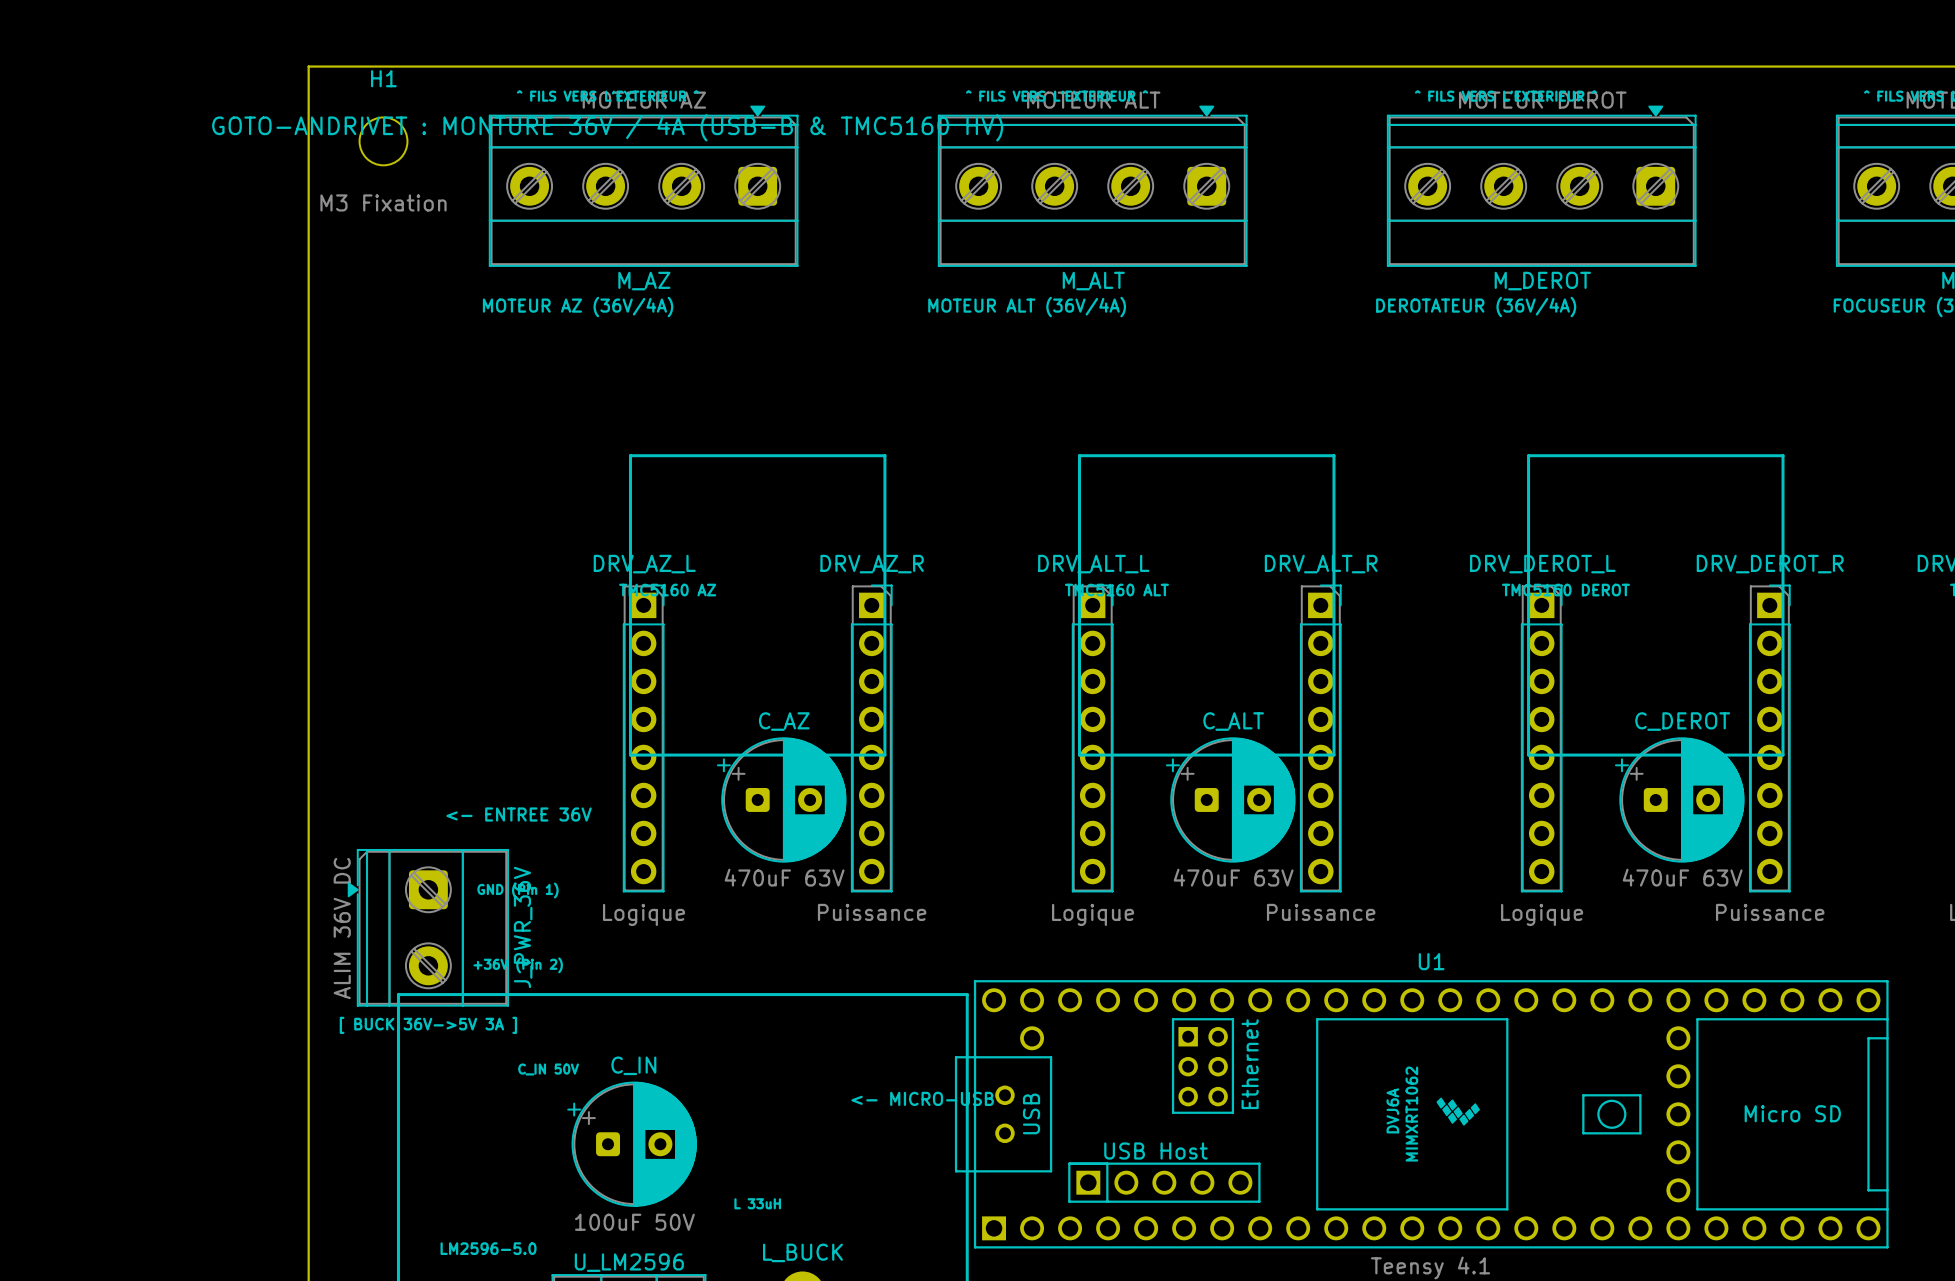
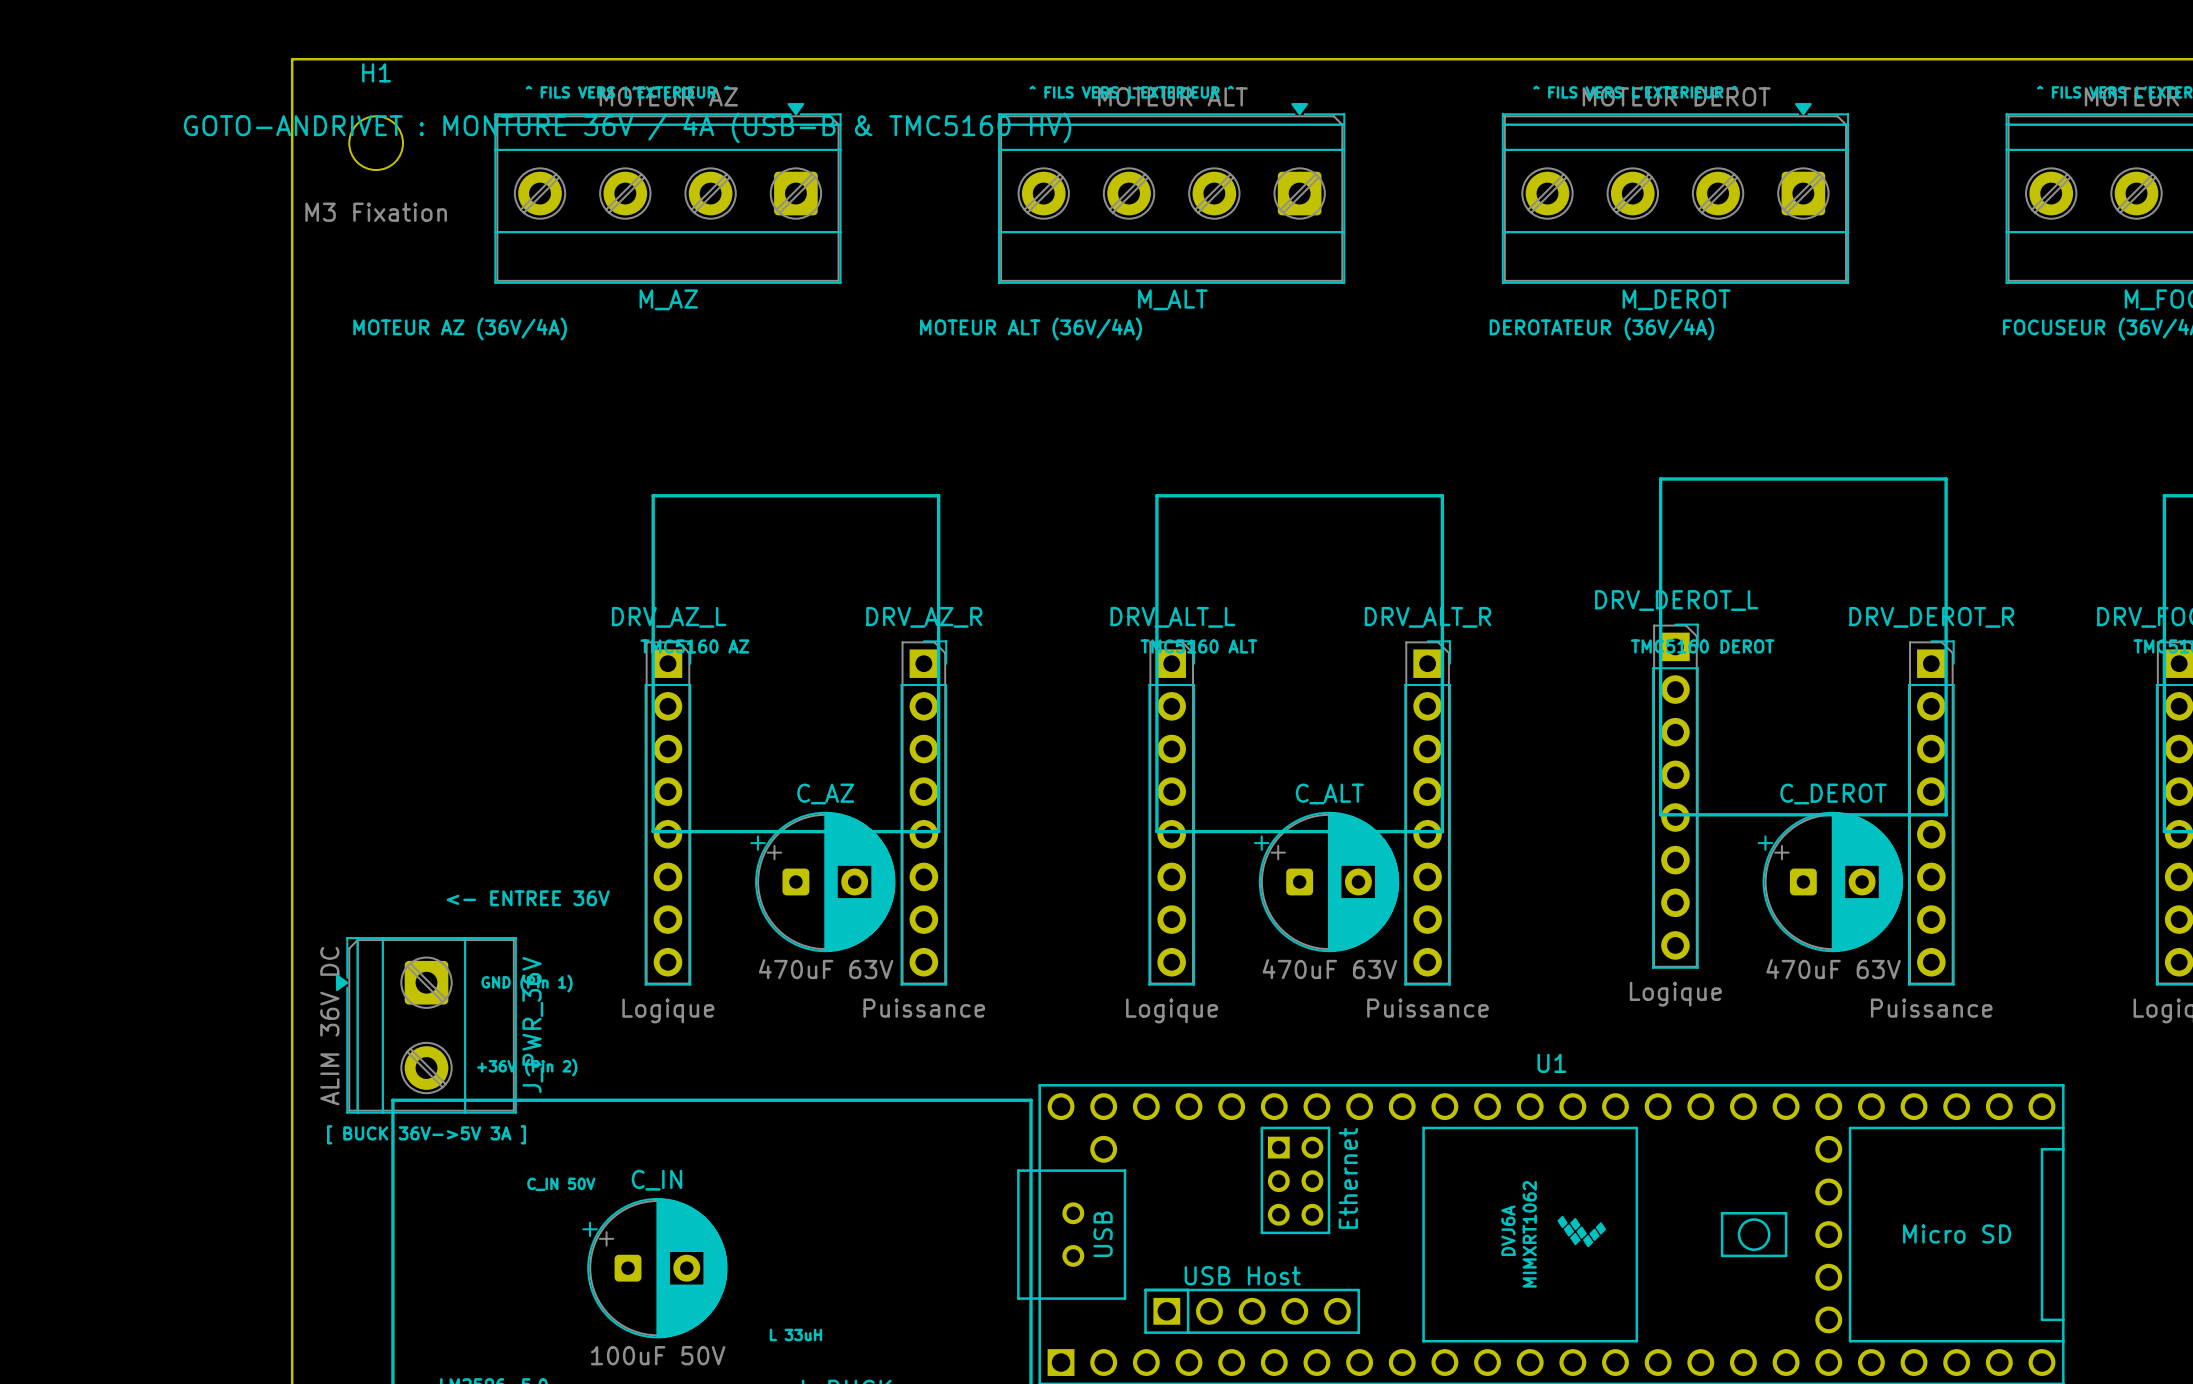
text position: MOTEUR AZ (36V/4A) (578, 307) -> MOTEUR AZ (36V/4A) (460, 328)
text position: MOTEUR ALT (36V/4A) (1027, 307) -> MOTEUR ALT (36V/4A) (1030, 328)
line: (1528, 455) (1783, 455) -> (1660, 495) (1660, 478) (1946, 478) (1946, 495)
DRV_DEROT_L position: (1541, 738) -> (1675, 796)
line: (1528, 740) (1528, 755) (1783, 755) (1783, 740) -> (1660, 814) (1946, 814)
text: <- MICRO-USB (922, 1098) -> none

